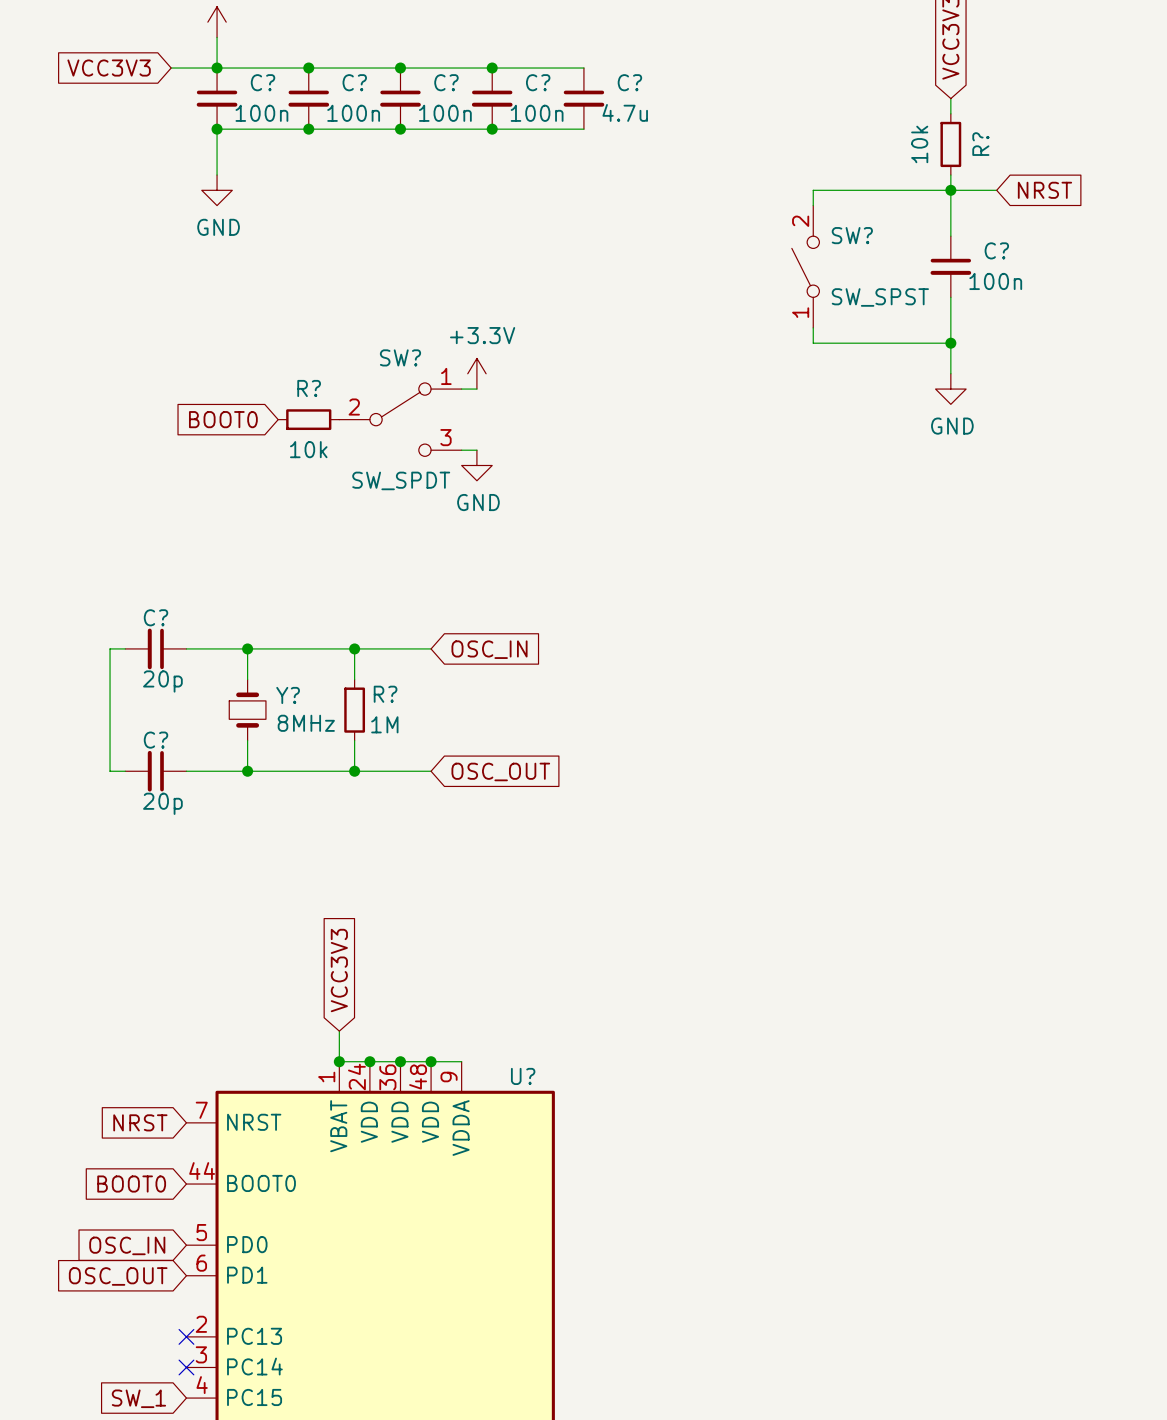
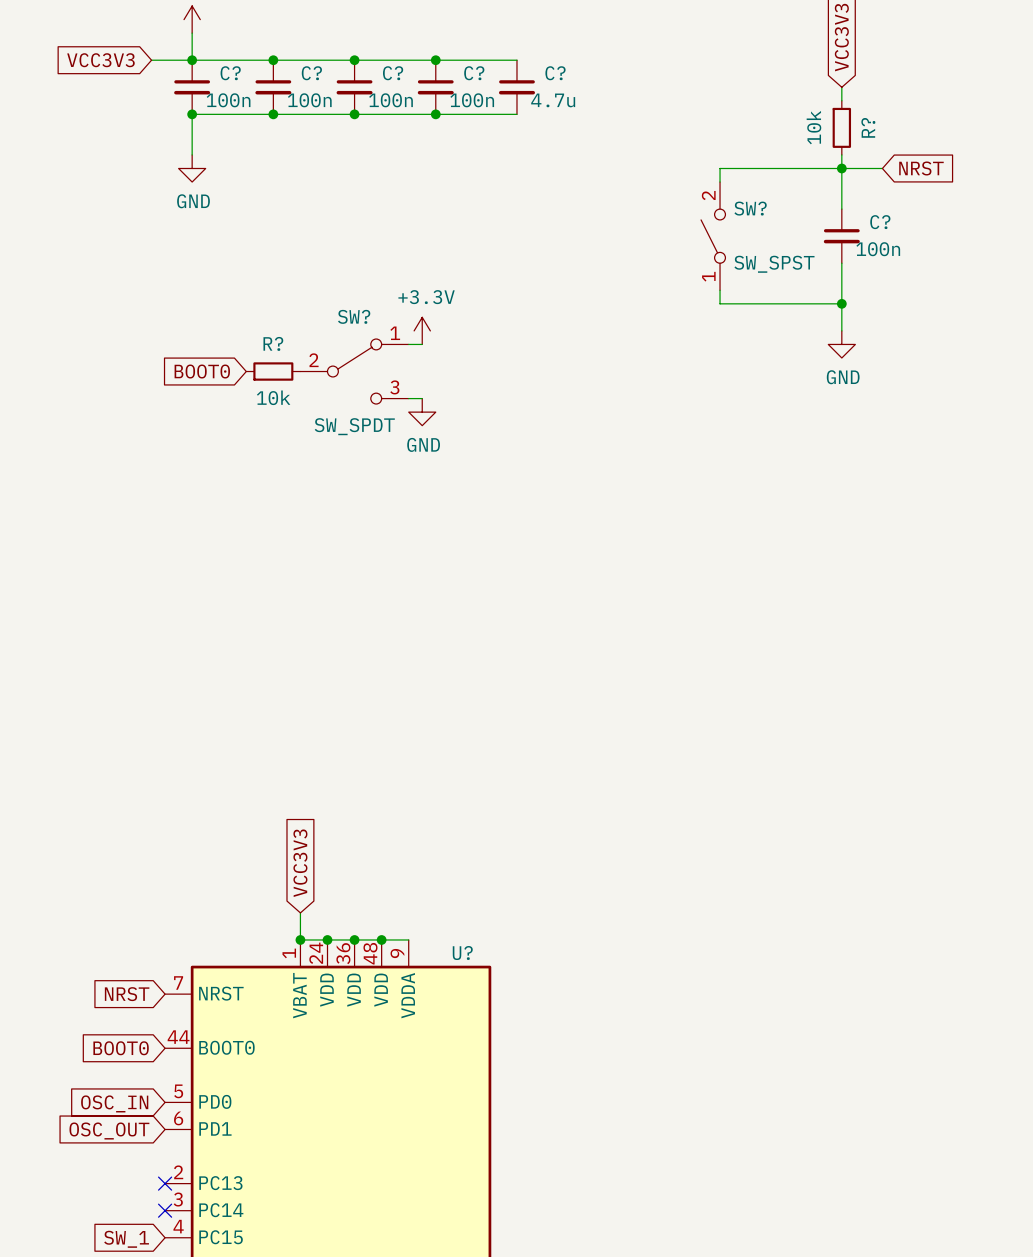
wire: (125, 648) (110, 648) (110, 771) (125, 771) -> none
C?: 20p (155, 648) -> none
wire: (186, 648) (431, 648) -> none
wire: (247, 648) (247, 679) -> none
junction: (247, 648) -> none
wire: (354, 648) (354, 679) -> none
junction: (354, 648) -> none
global label: OSC_IN (489, 649) -> none
Y?: 8MHz (247, 710) -> none
R?: 1M (354, 710) -> none
wire: (247, 740) (247, 771) -> none
wire: (354, 740) (354, 771) -> none
C?: 20p (155, 771) -> none
wire: (186, 771) (431, 771) -> none
junction: (247, 771) -> none
junction: (354, 771) -> none
global label: OSC_OUT (500, 771) -> none

